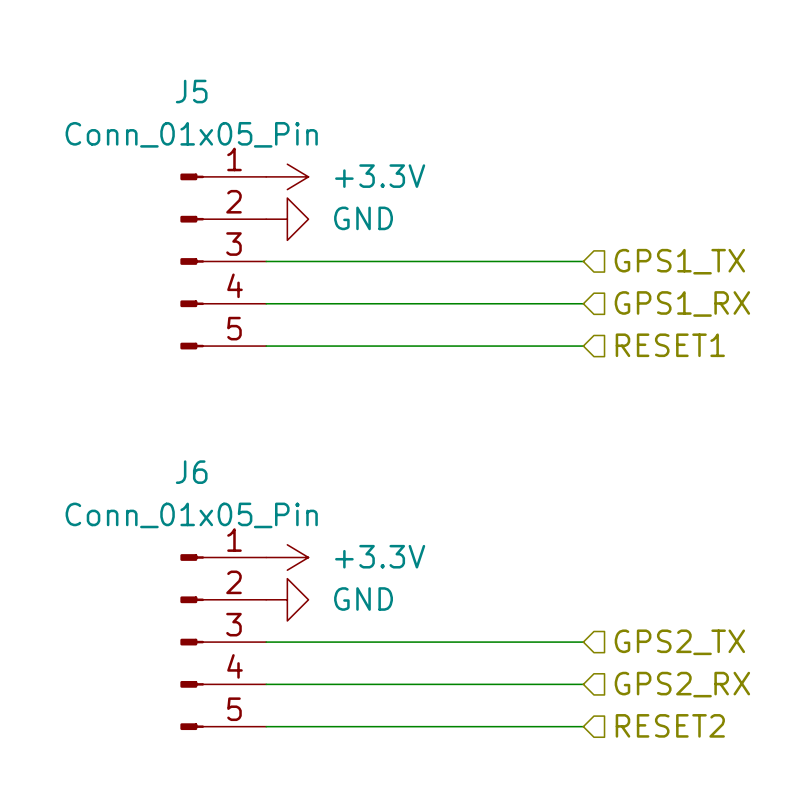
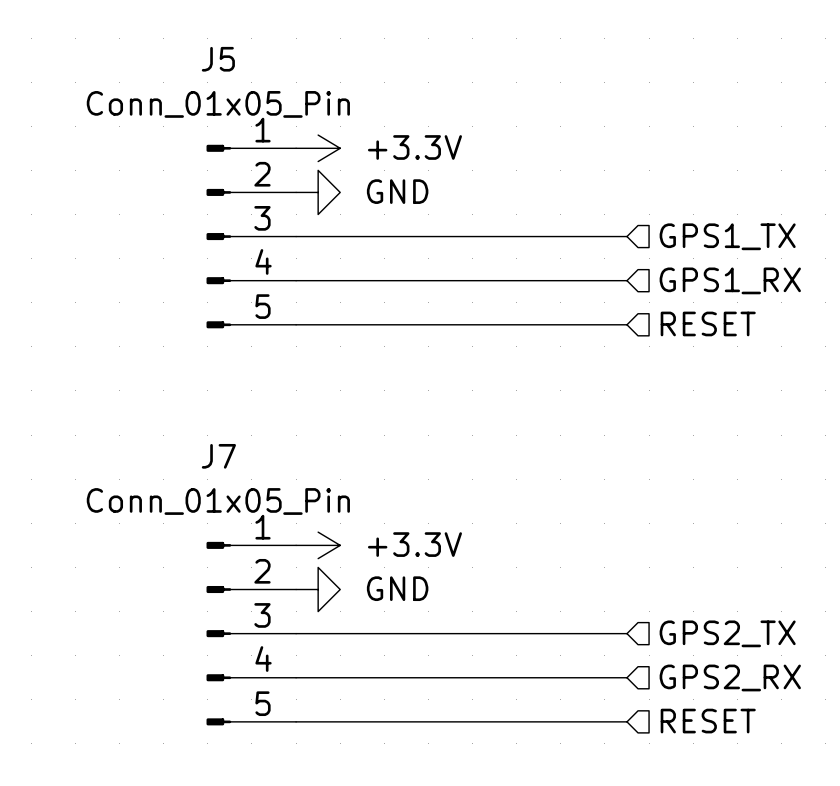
hierarchical label: RESET1 (670, 345) -> RESET (708, 323)
J6 name: J6 (191, 472) -> J7 (218, 456)
hierarchical label: RESET2 (670, 725) -> RESET (708, 721)

